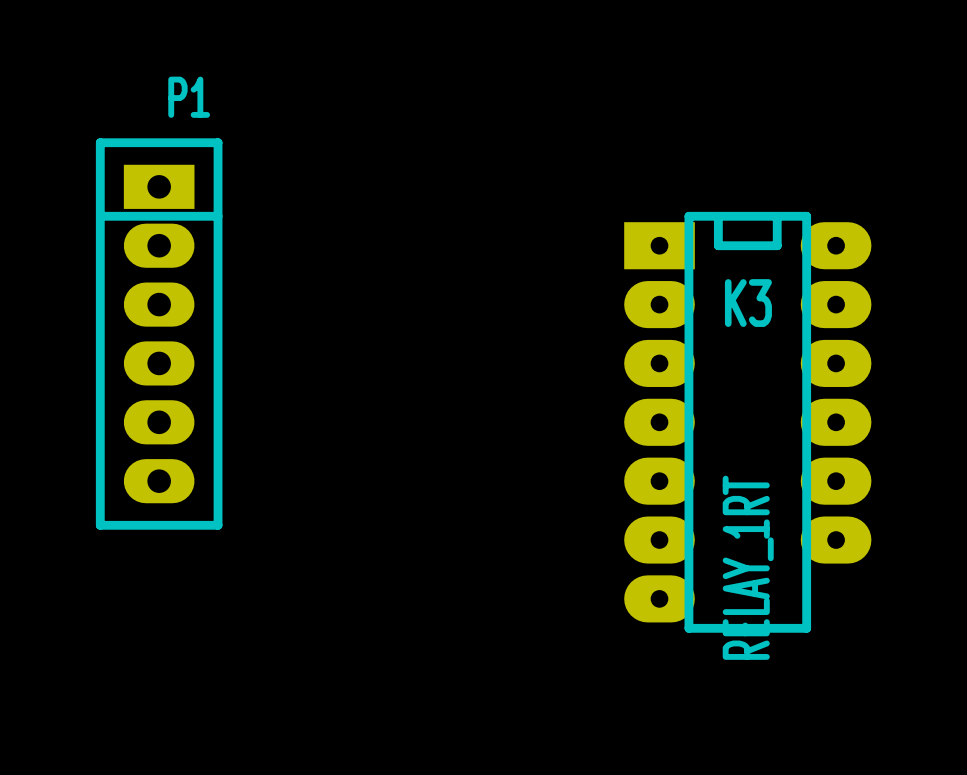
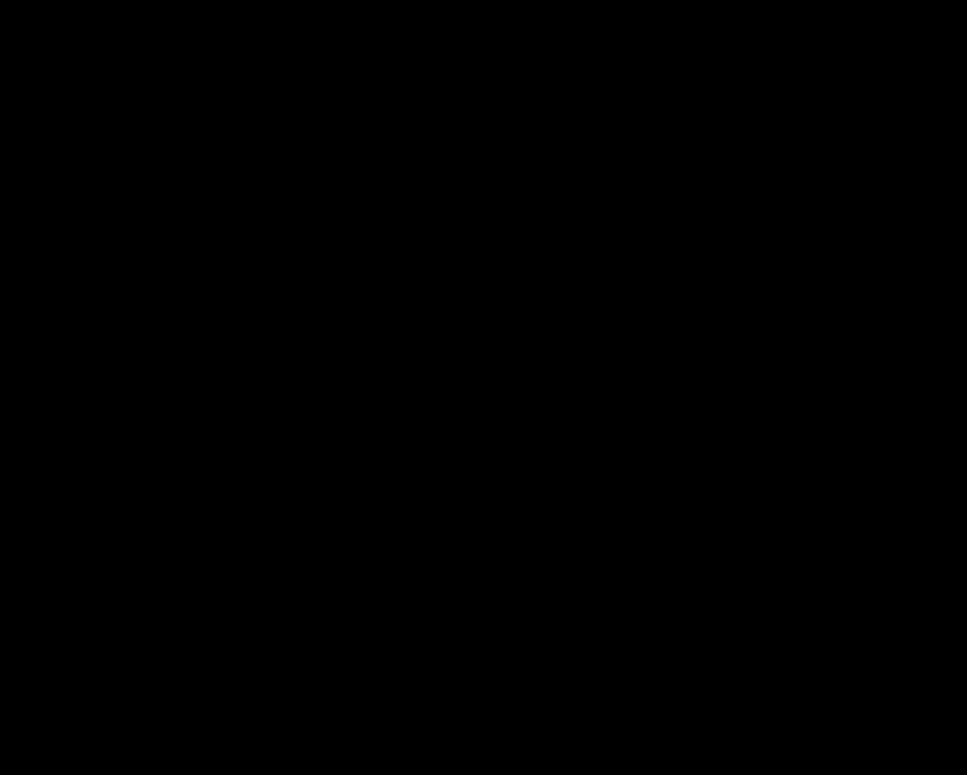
P1: (159, 334) -> none
K3: RELAY_1RT (747, 422) -> none

